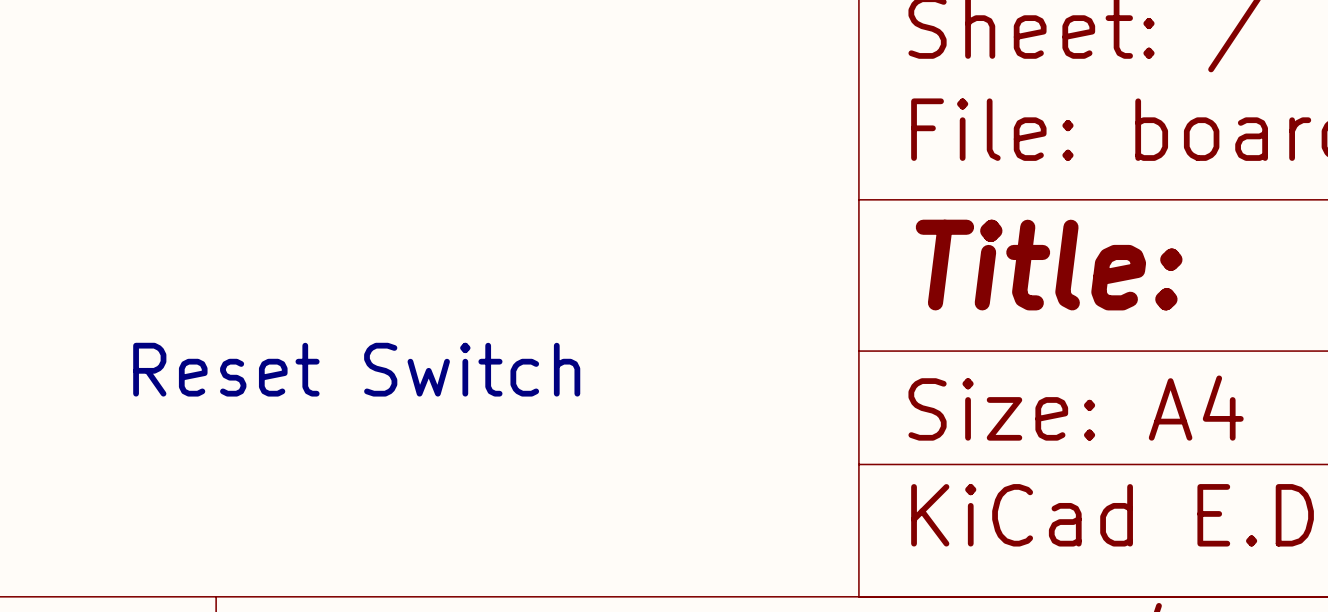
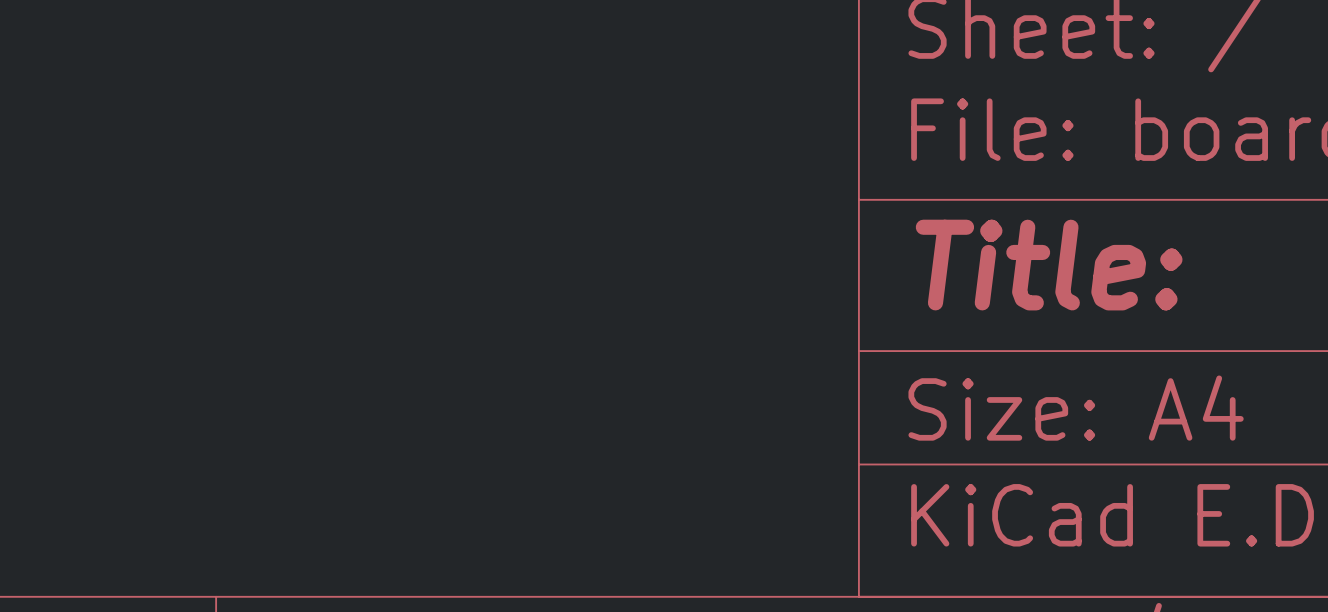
text: Reset Switch (356, 369) -> none

